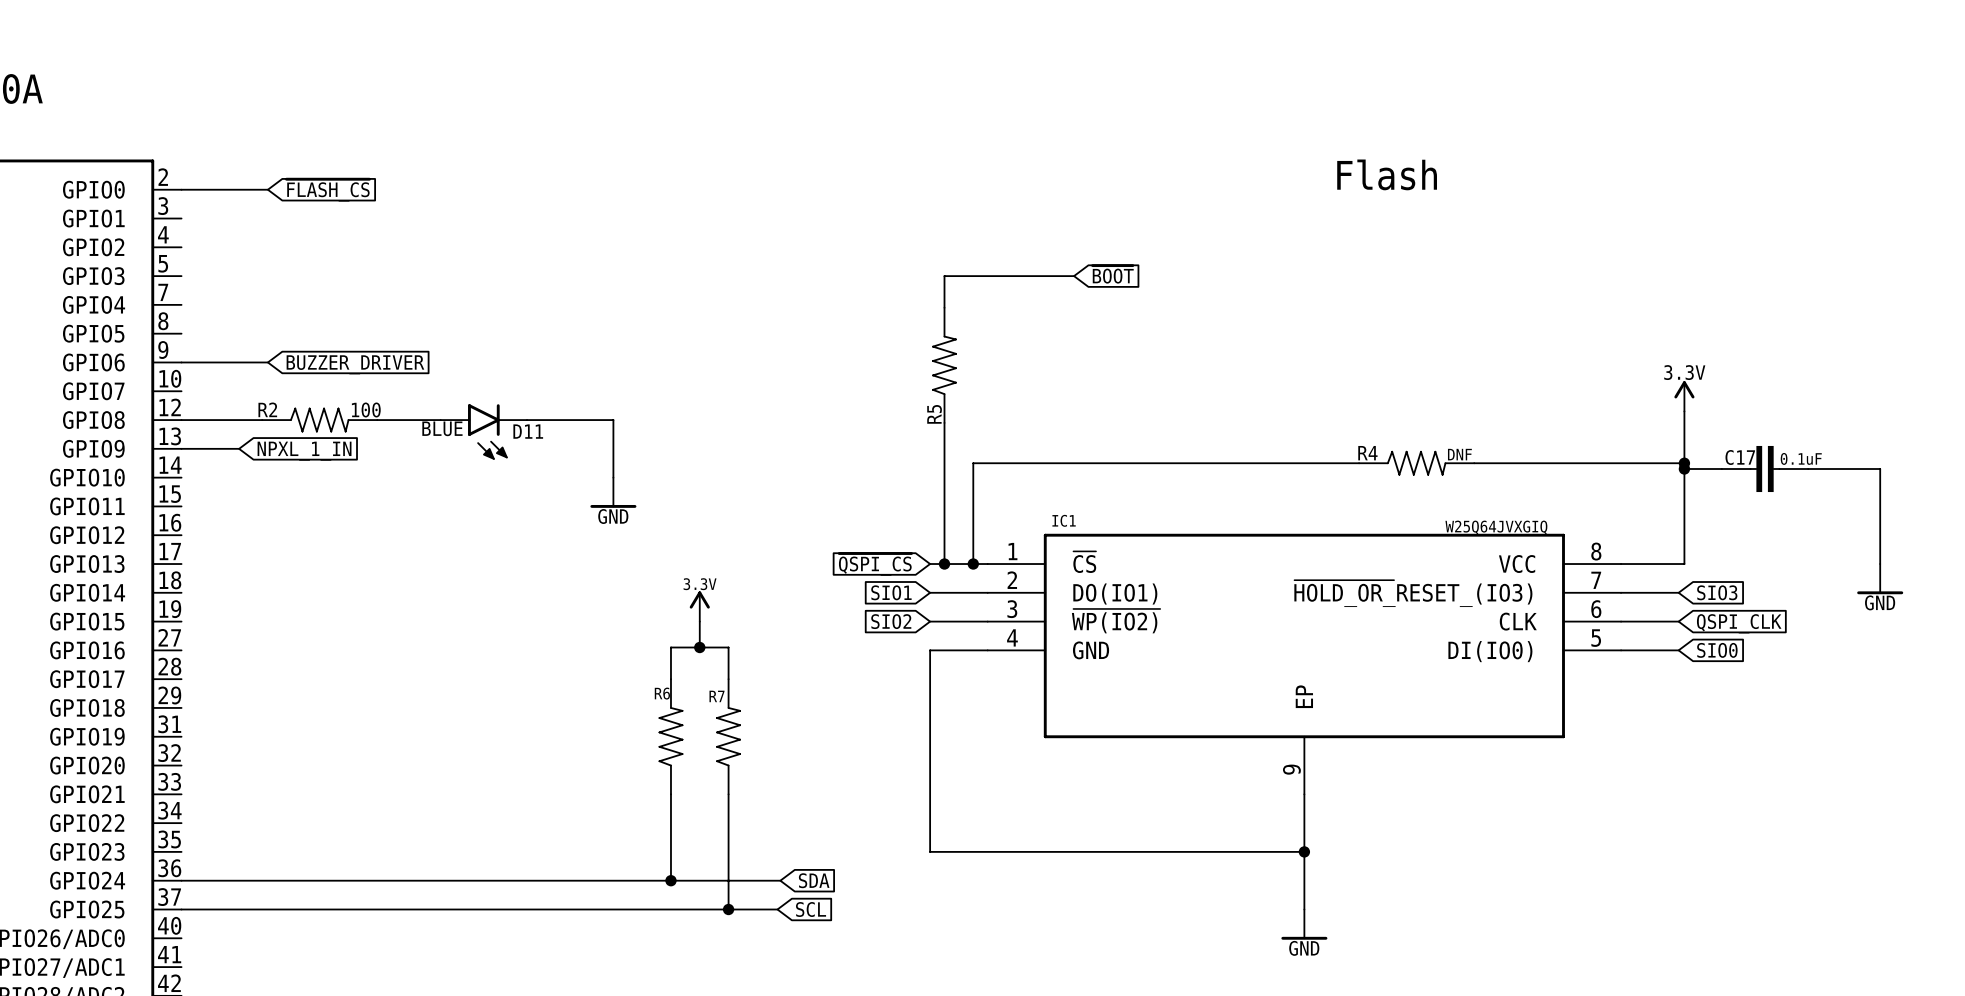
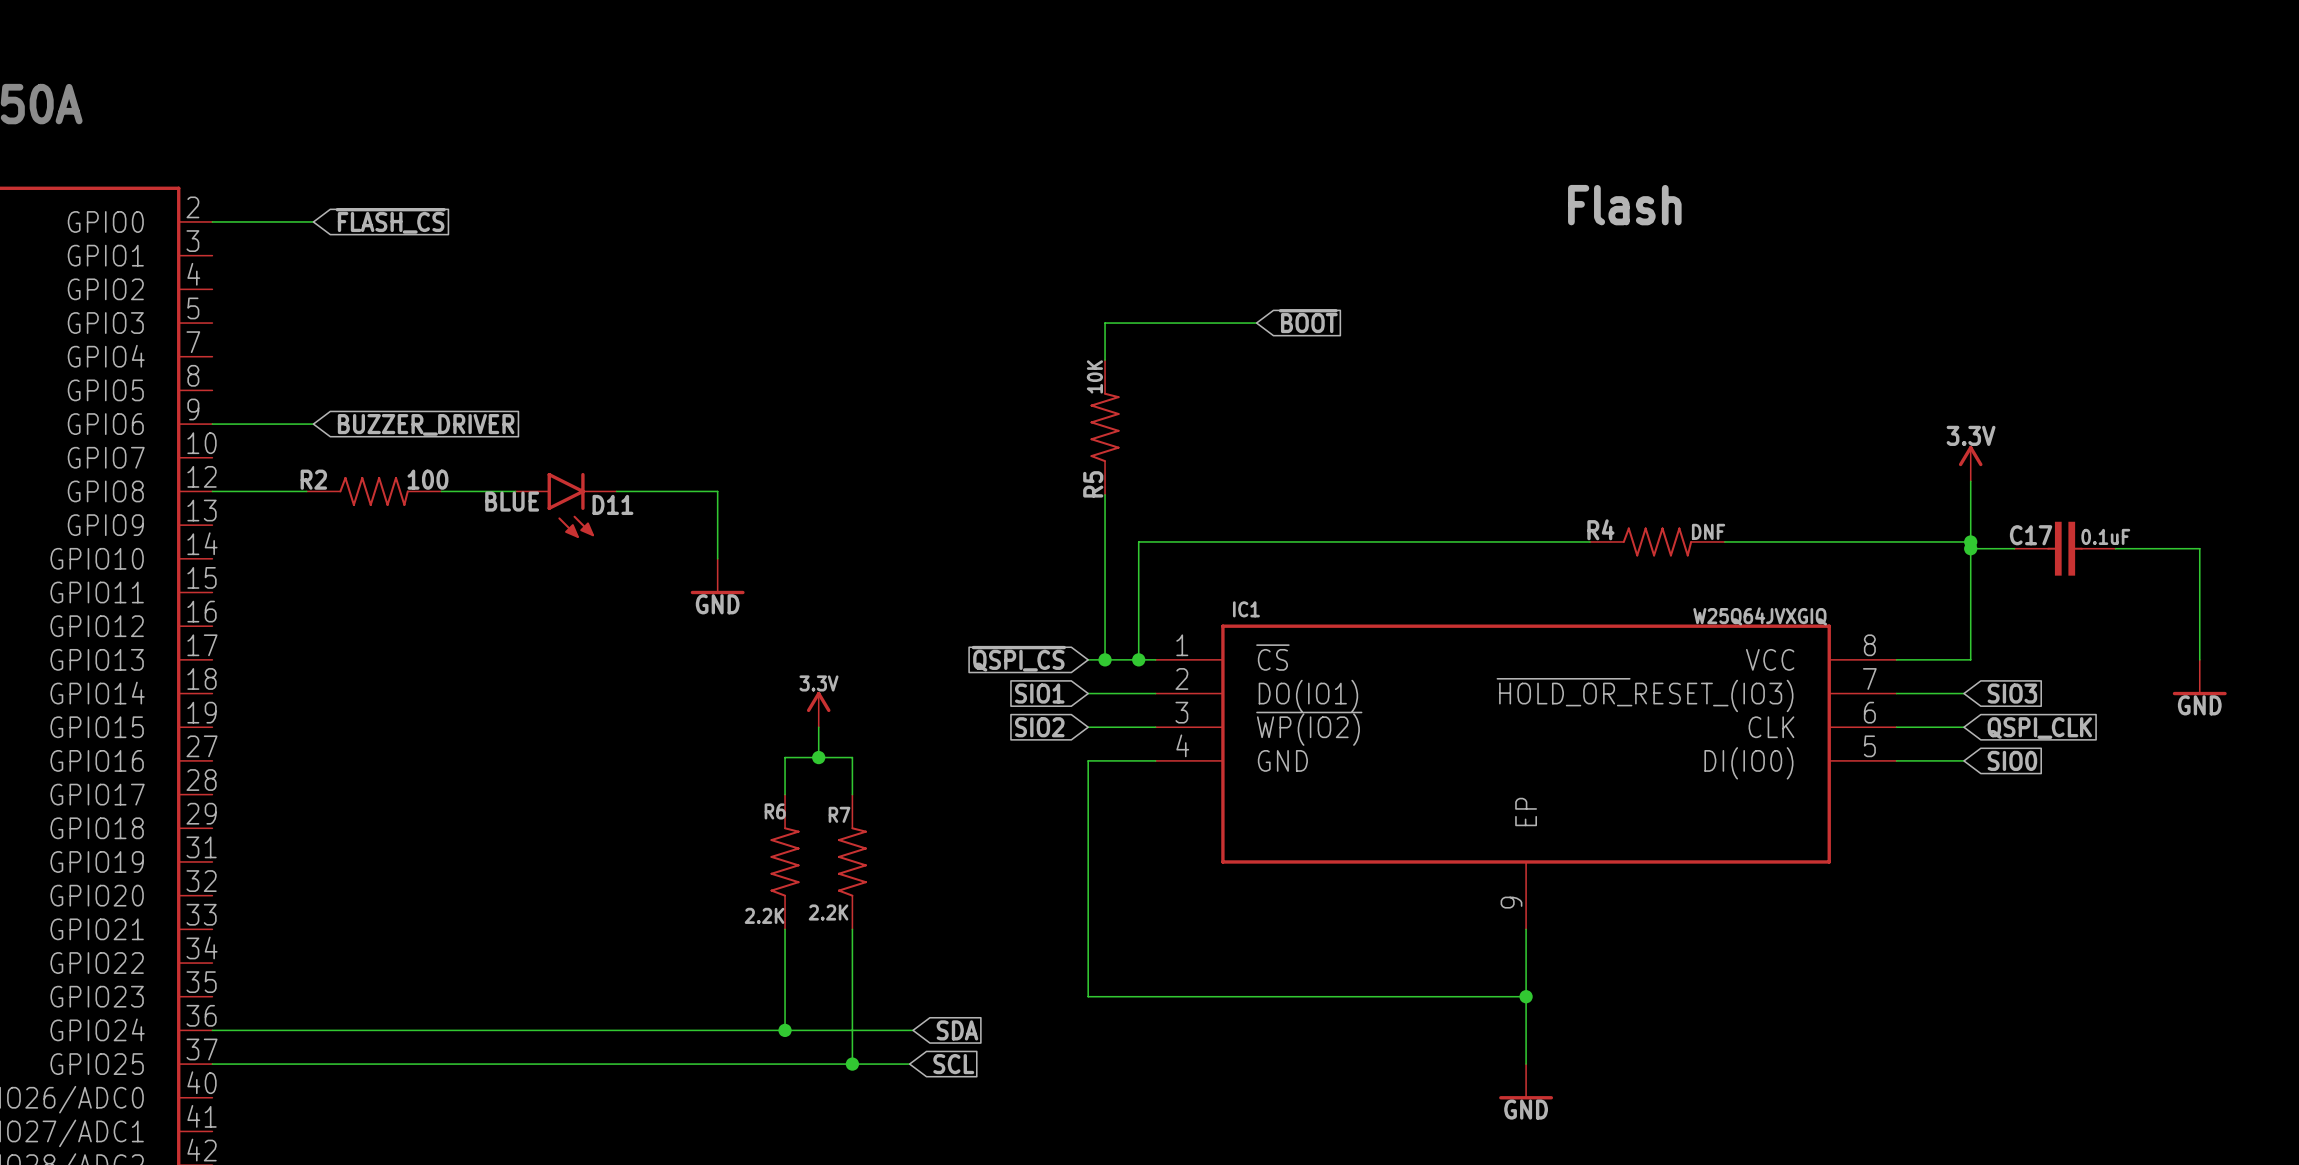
R5 value: none -> 10K (1094, 376)
wire: (181, 448) (239, 448) -> none
global label: NPXL_1_IN (304, 451) -> none
R7 value: none -> 2.2K (828, 912)
R6 value: none -> 2.2K (764, 915)

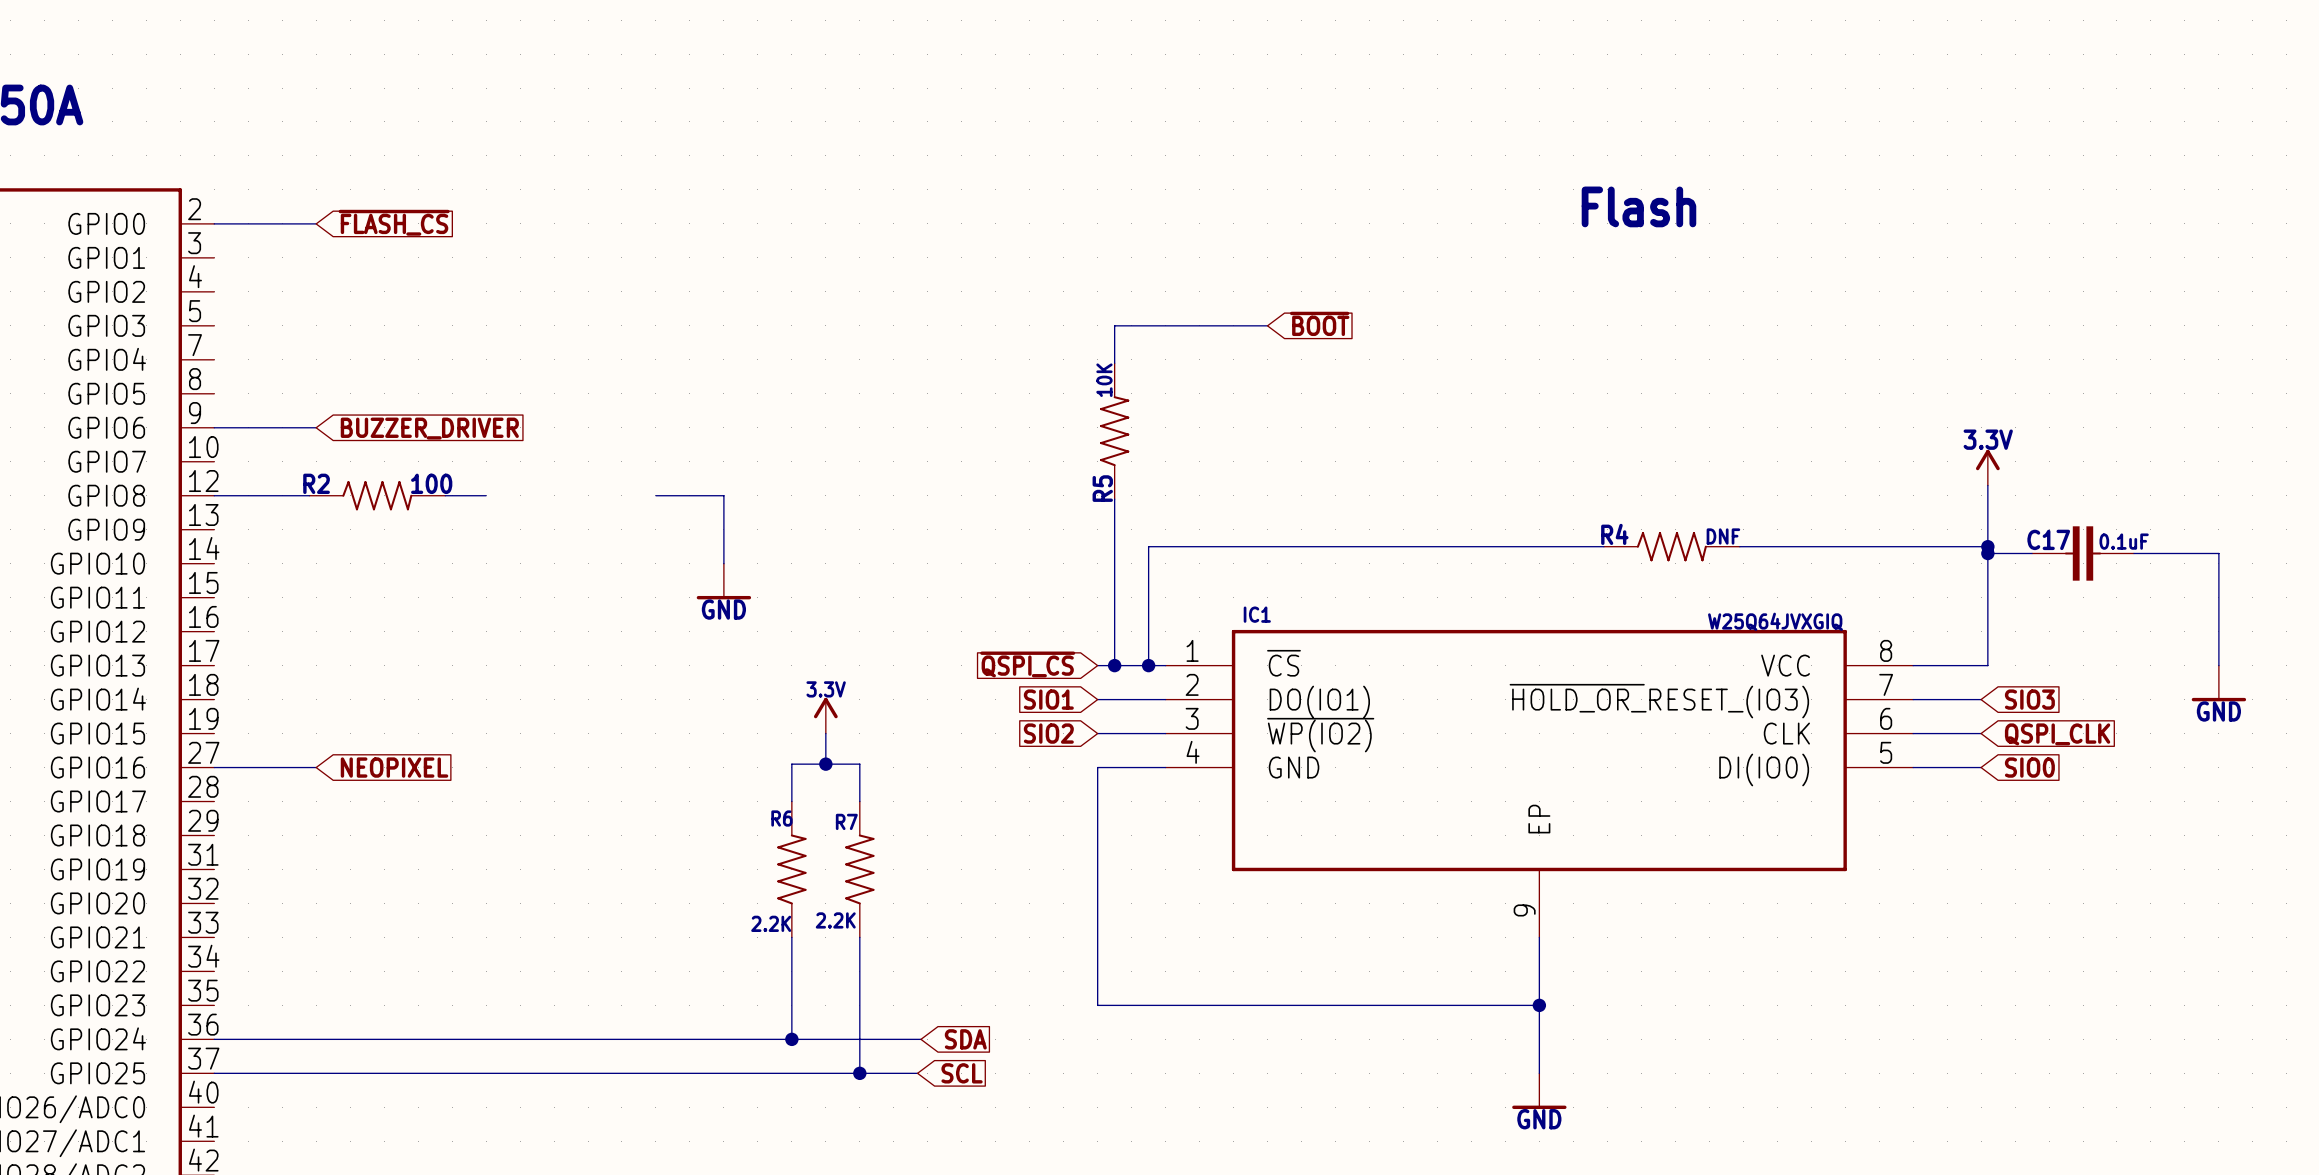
wire: (481, 491) (515, 491) -> none
wire: (616, 491) (650, 491) -> none
D11: BLUE (566, 505) -> none
wire: none -> (214, 767) (316, 767)
global label: none -> NEOPIXEL (394, 767)

